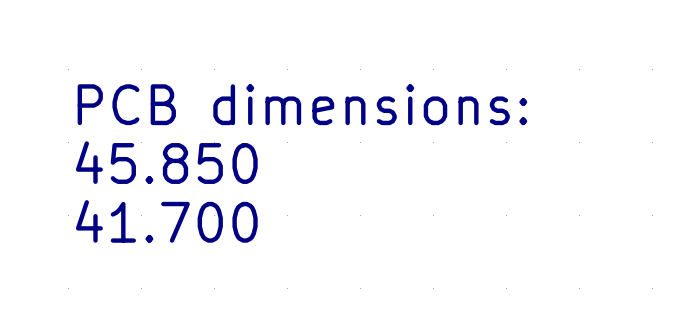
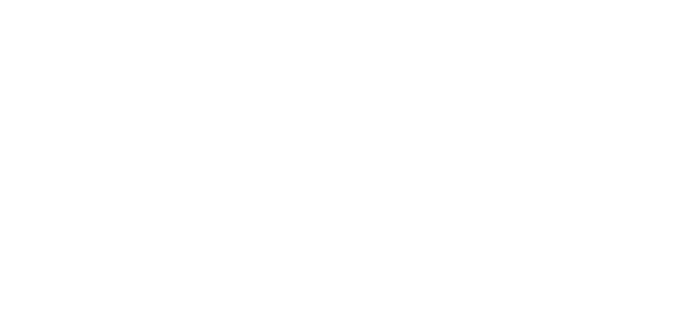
text: PCB dimensions: (302, 104) -> none
text: 45.850 (166, 162) -> none
text: 41.700 (166, 221) -> none

